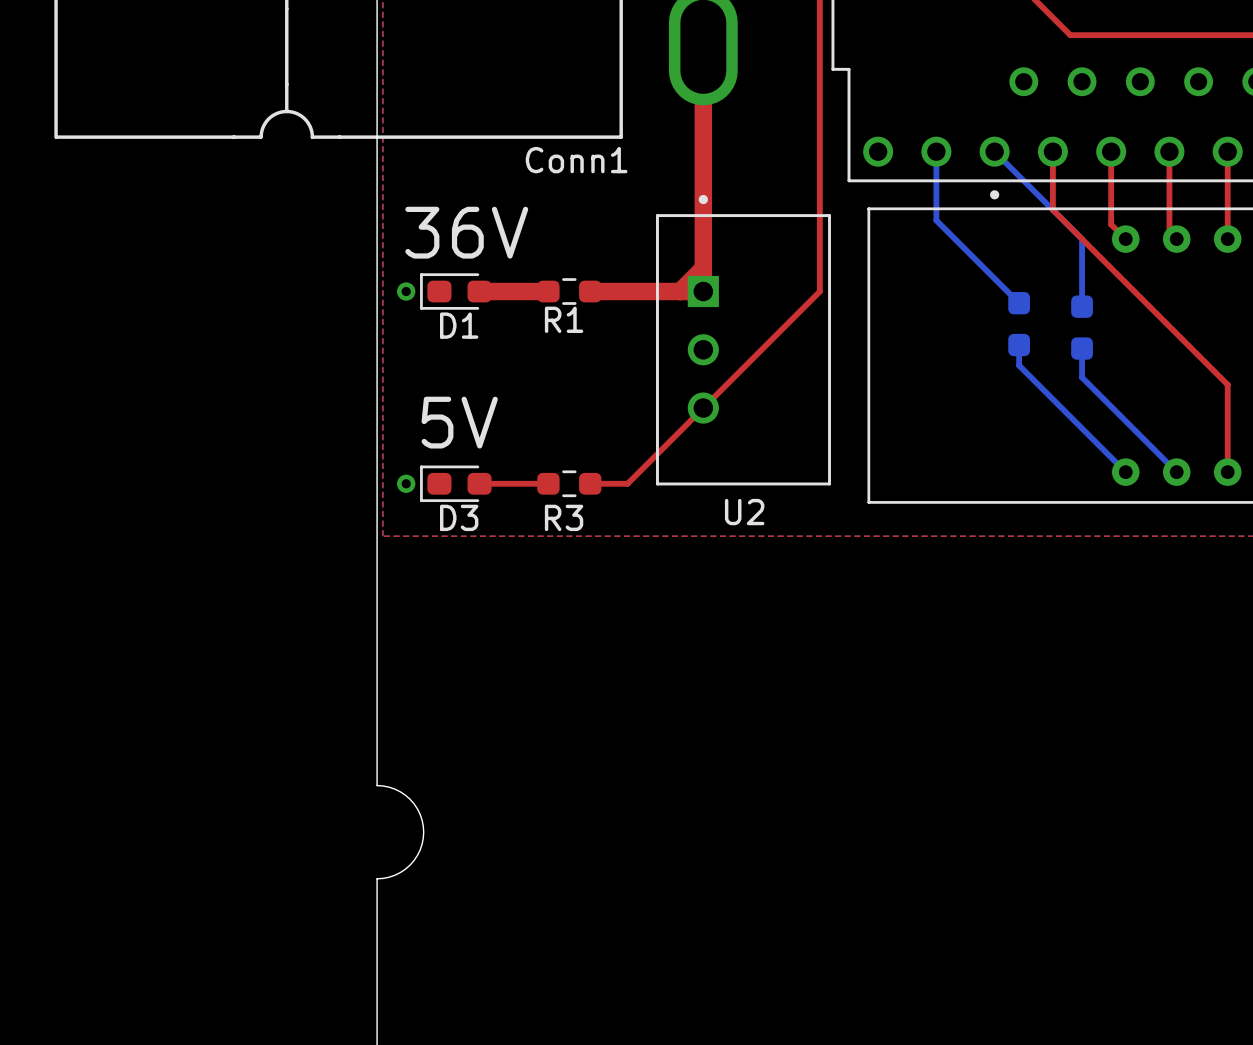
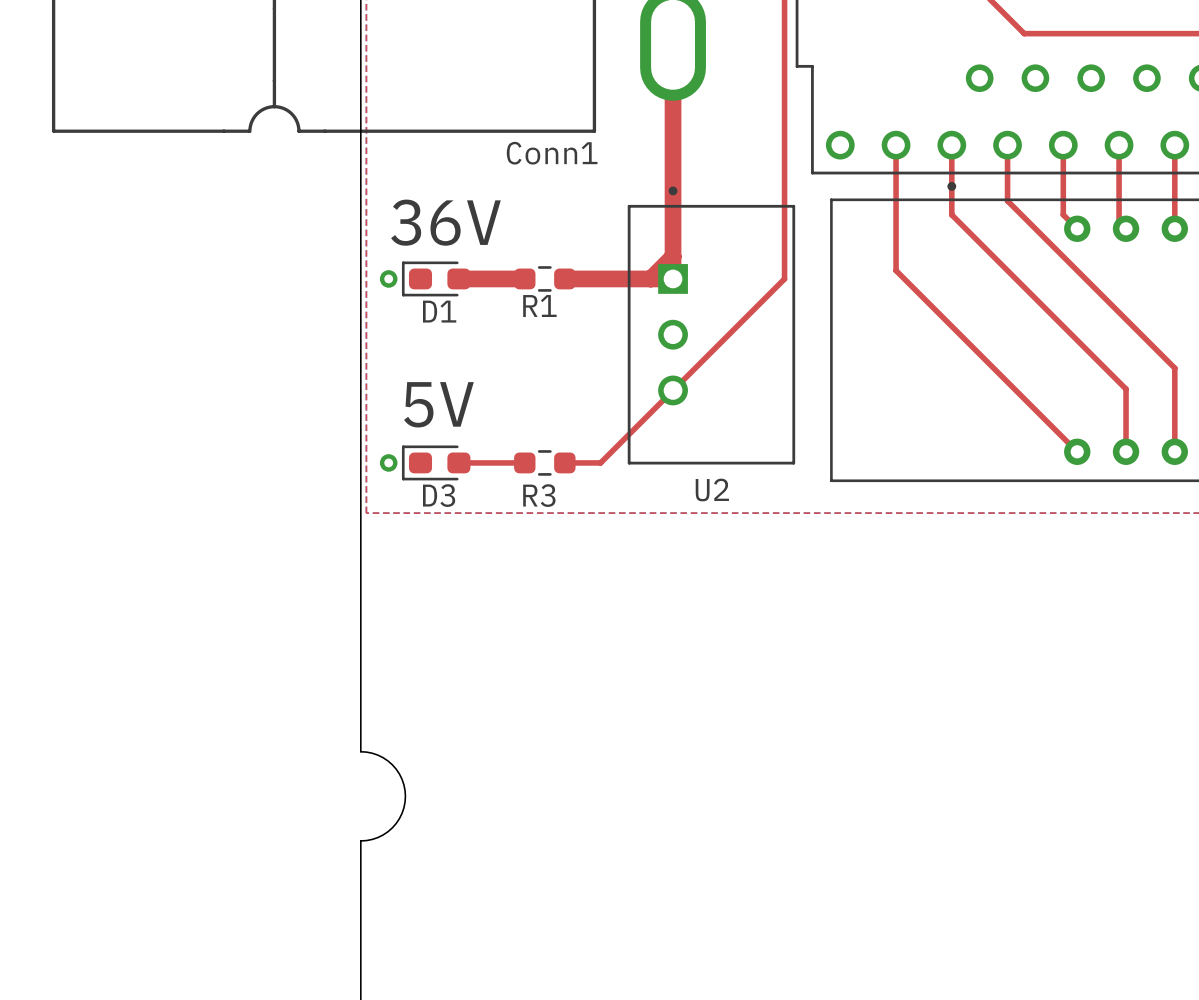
top track: none -> (896, 145) (896, 270) (1077, 451)
bottom track: (936, 151) (936, 220) (1019, 303) -> none
top track: none -> (951, 145) (951, 214) (1126, 389) (1126, 451)
bottom track: (994, 151) (1082, 239) (1082, 306) -> none
part: (1019, 324) -> none
part: (1082, 327) -> none
bottom track: (1019, 345) (1019, 365) (1125, 472) -> none
bottom track: (1082, 348) (1082, 377) (1176, 472) -> none

